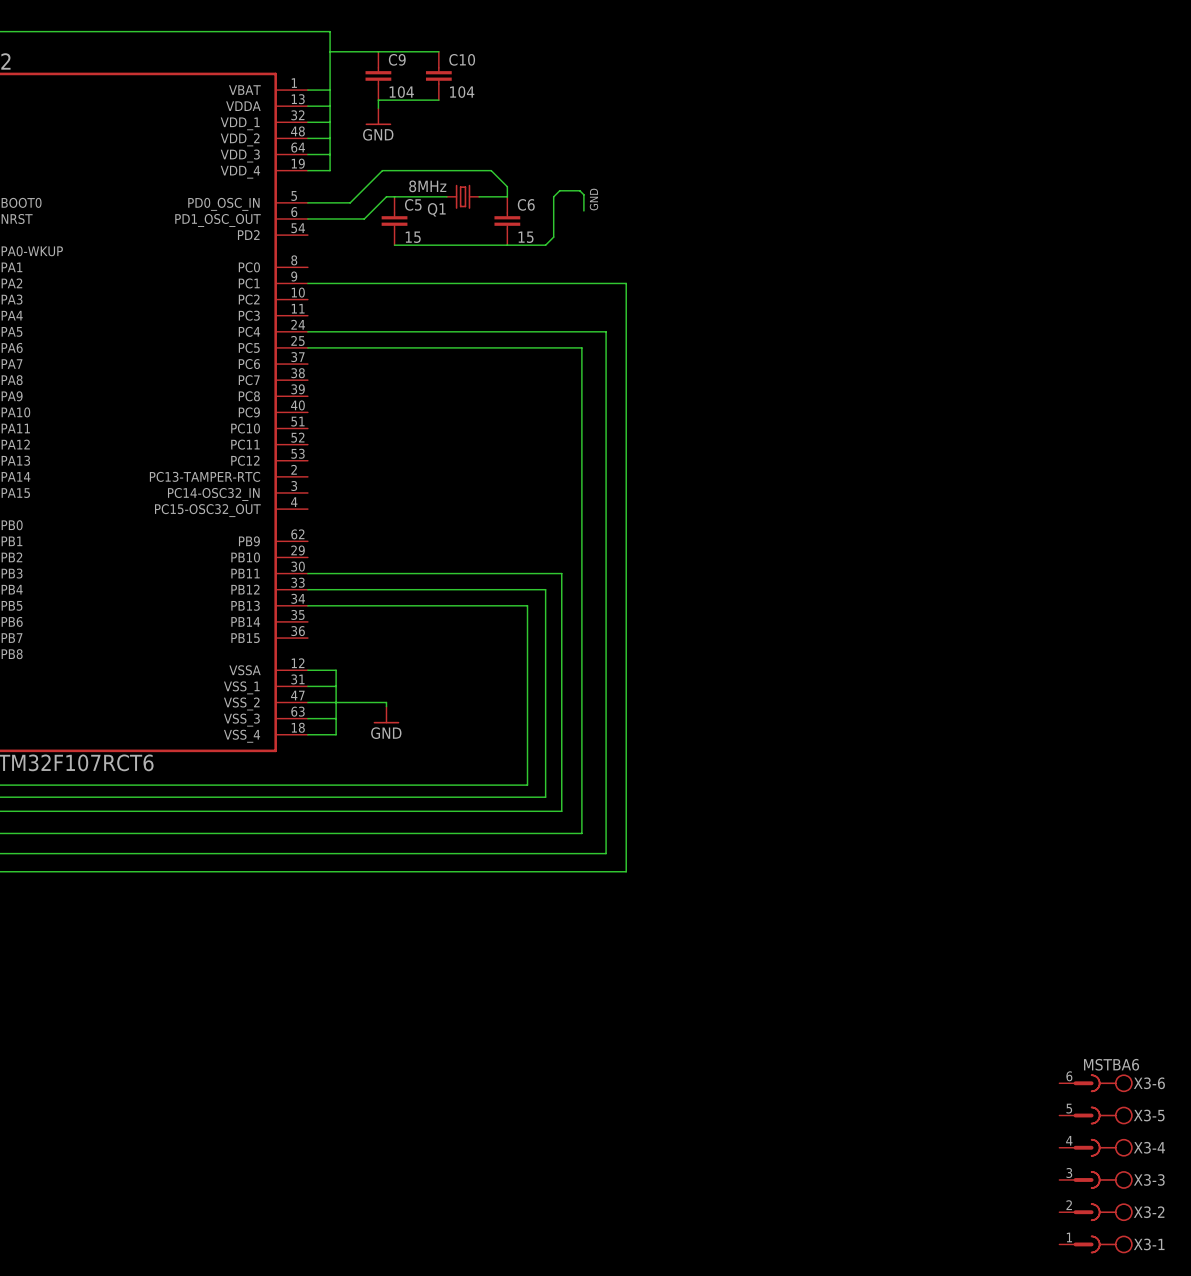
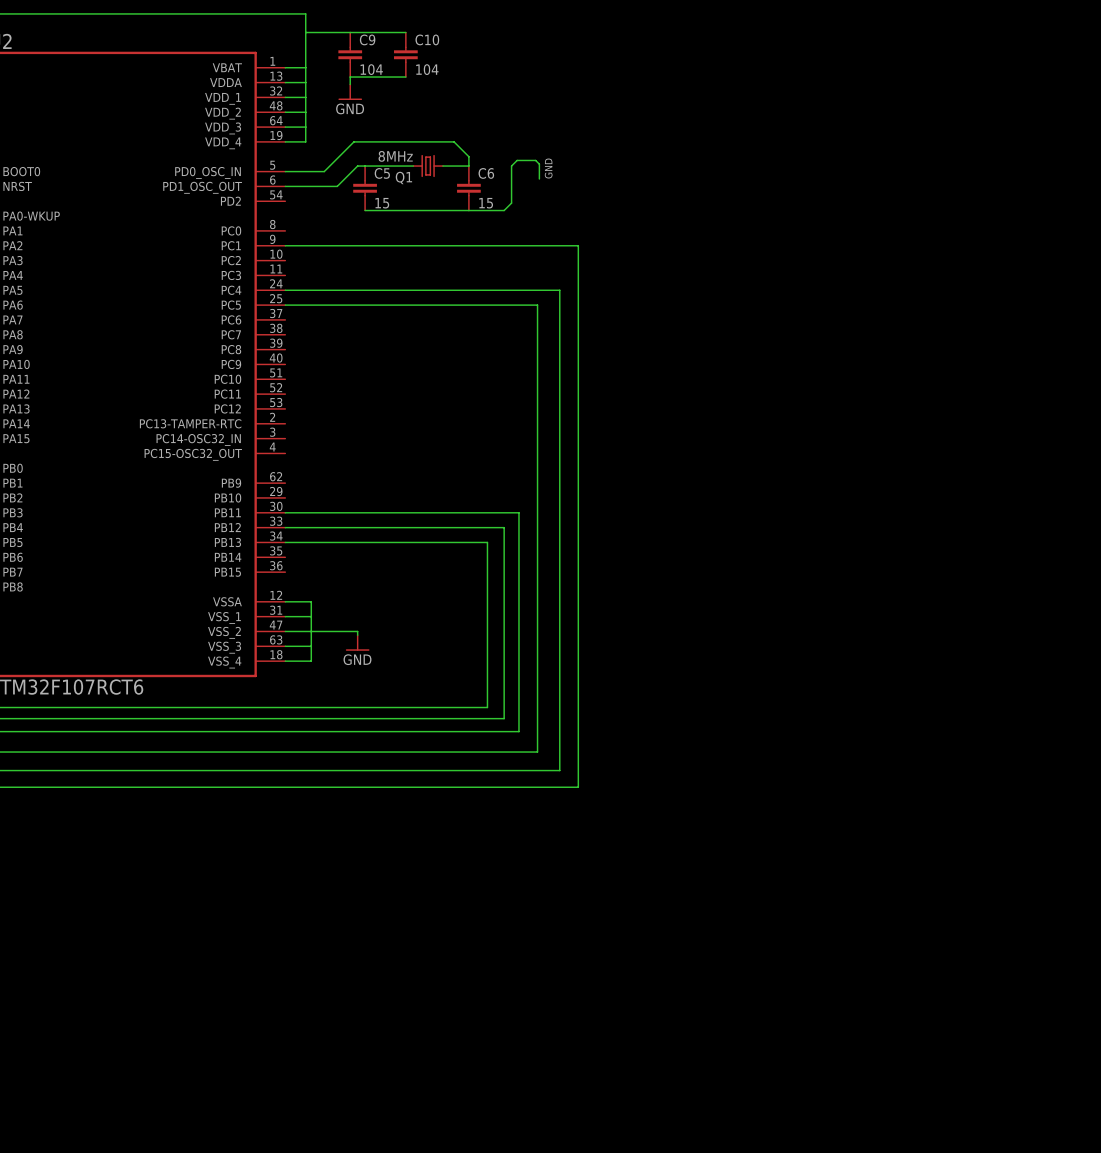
X3-6: MSTBA6 (1096, 1083) -> none
X3-5: (1096, 1115) -> none
X3-4: (1096, 1147) -> none
X3-3: (1096, 1179) -> none
X3-2: (1096, 1212) -> none
X3-1: (1096, 1244) -> none

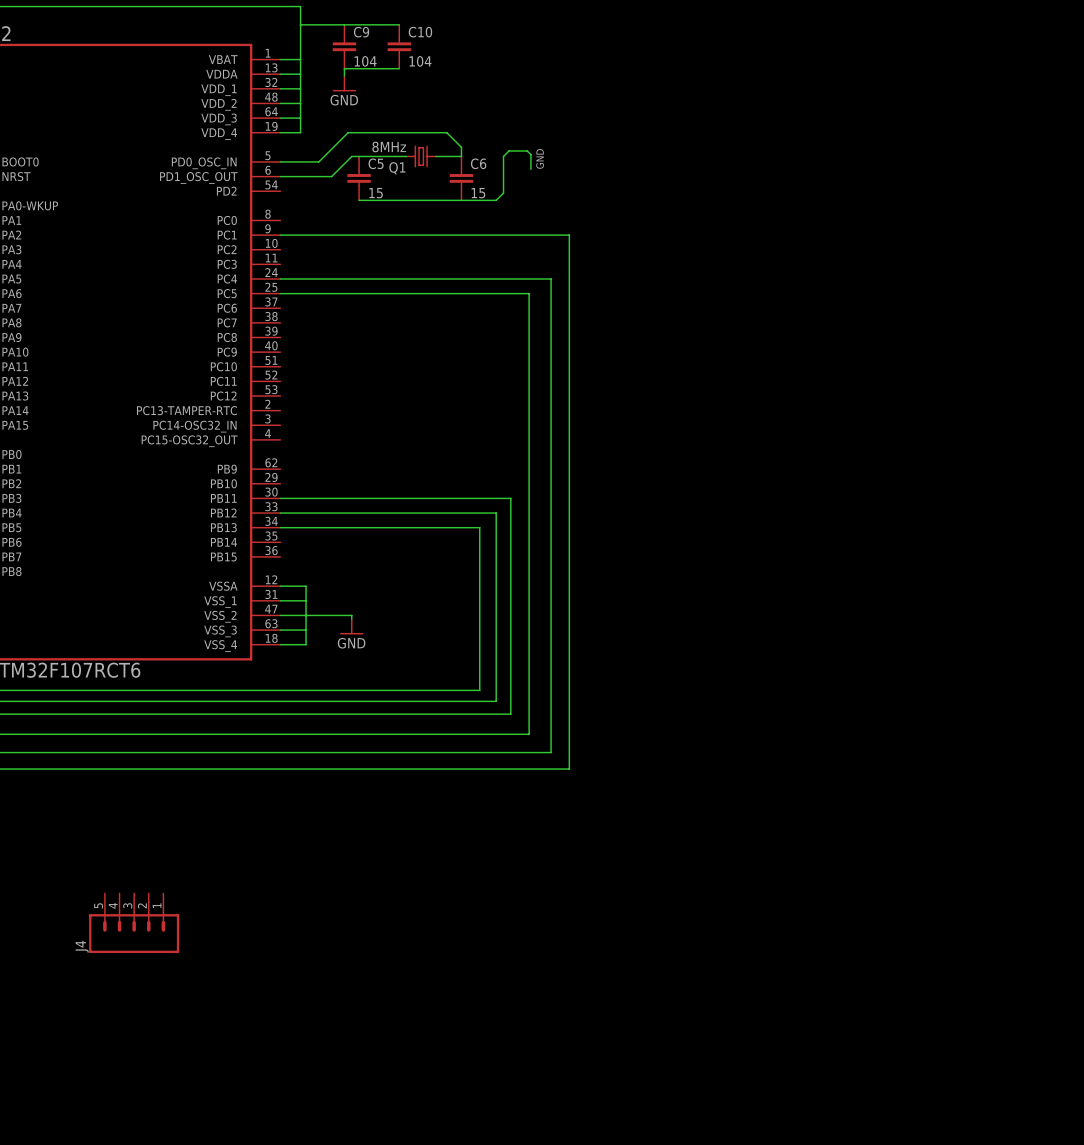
J4: none -> (134, 923)

